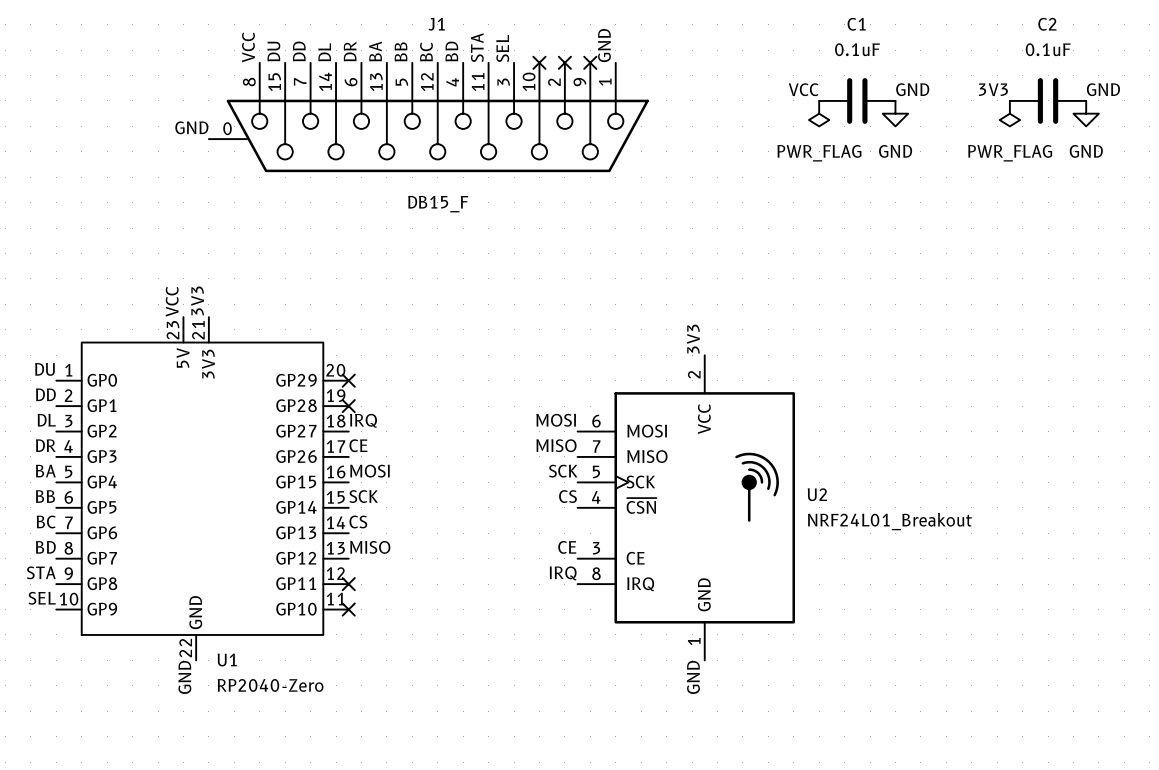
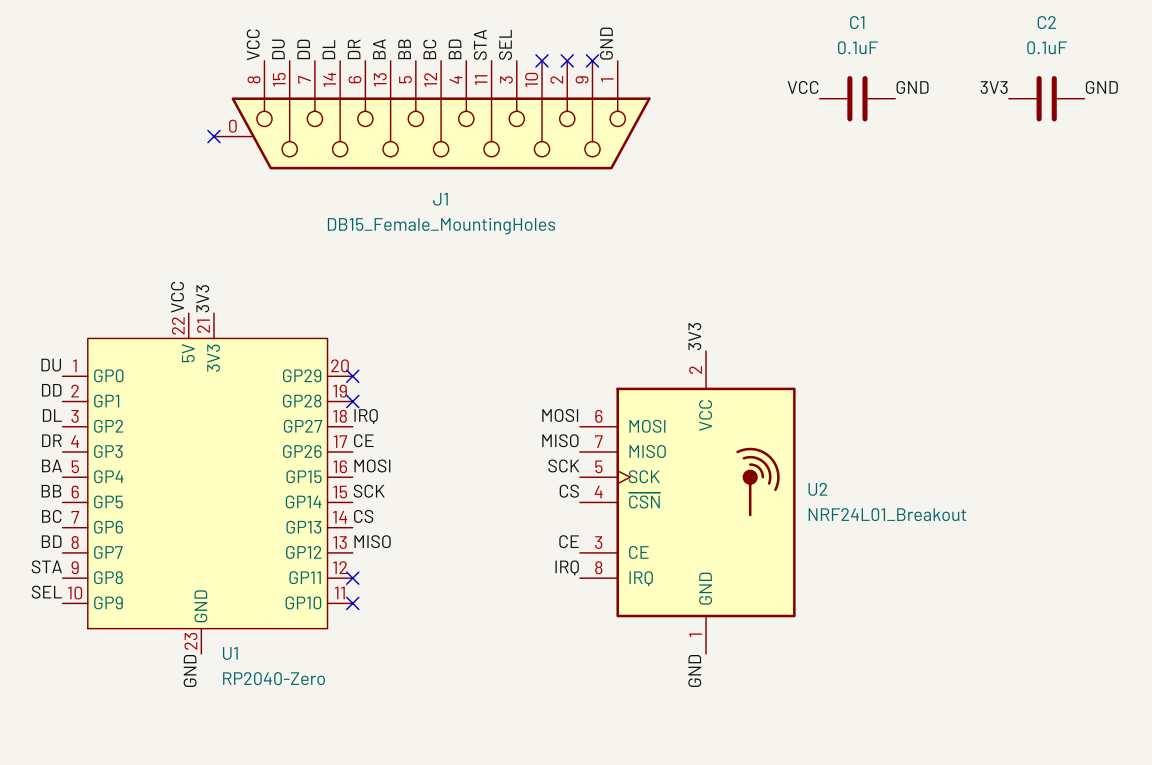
J1 name position: J1 (436, 24) -> J1 (440, 199)
power symbol: PWR_FLAG (819, 113) -> none
power symbol: GND (895, 113) -> none
power symbol: PWR_FLAG (1009, 113) -> none
power symbol: GND (1086, 113) -> none
label: GND (191, 127) -> none
no-connect mark: none -> (213, 136)
J1 value: DB15_F (438, 204) -> DB15_Female_MountingHoles (441, 226)
U1 pin number: 23 (172, 330) -> 22 (178, 325)
U1 pin number: 22 (185, 648) -> 23 (190, 641)

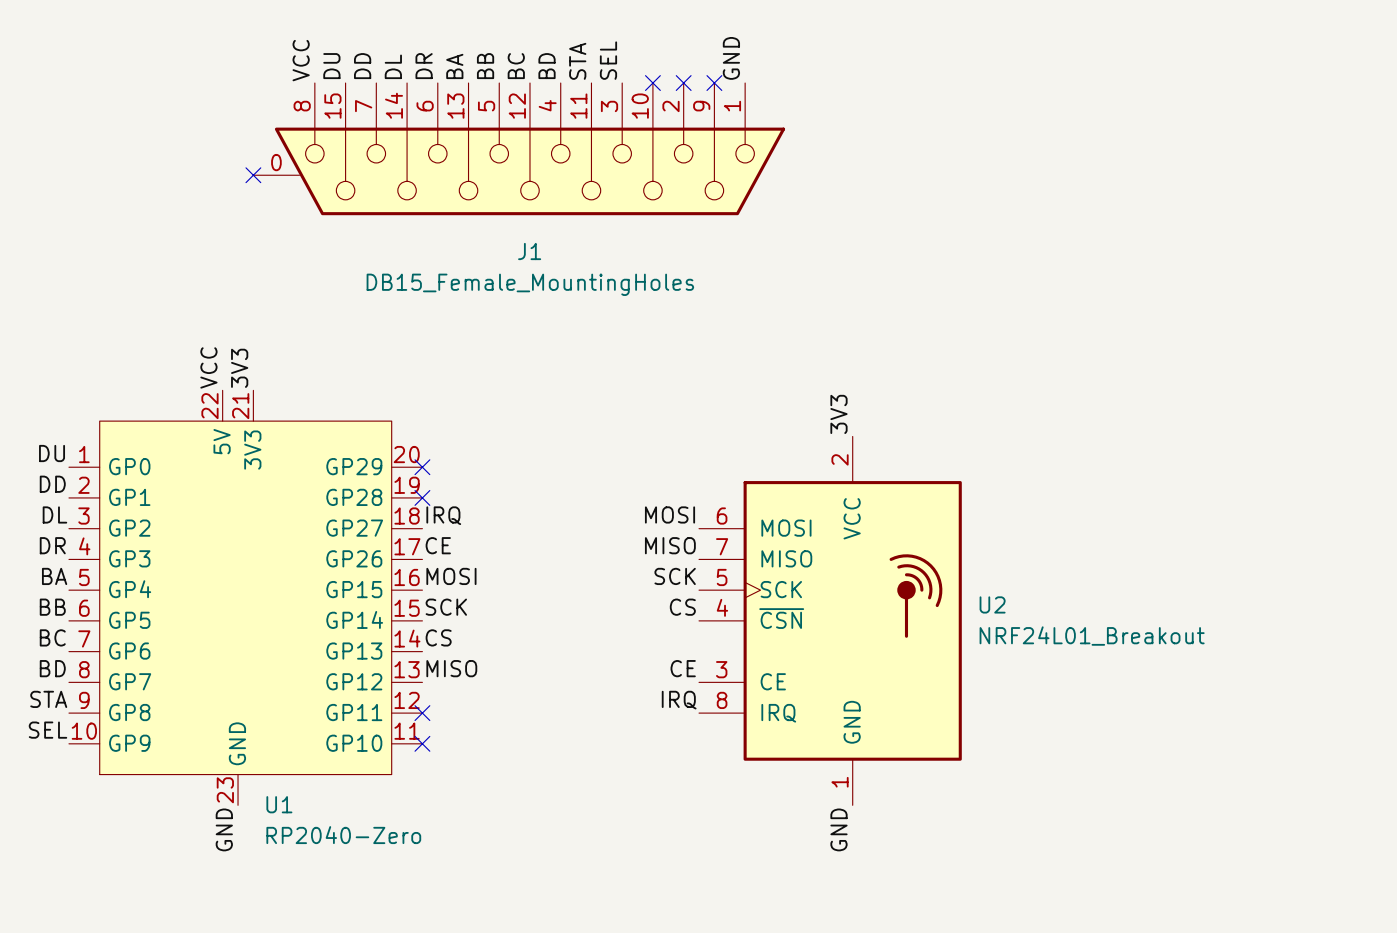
label: VCC (803, 87) -> none
label: GND (912, 87) -> none
label: 3V3 (994, 87) -> none
label: GND (1101, 87) -> none
C1: 0.1uF (857, 98) -> none
C2: 0.1uF (1046, 98) -> none

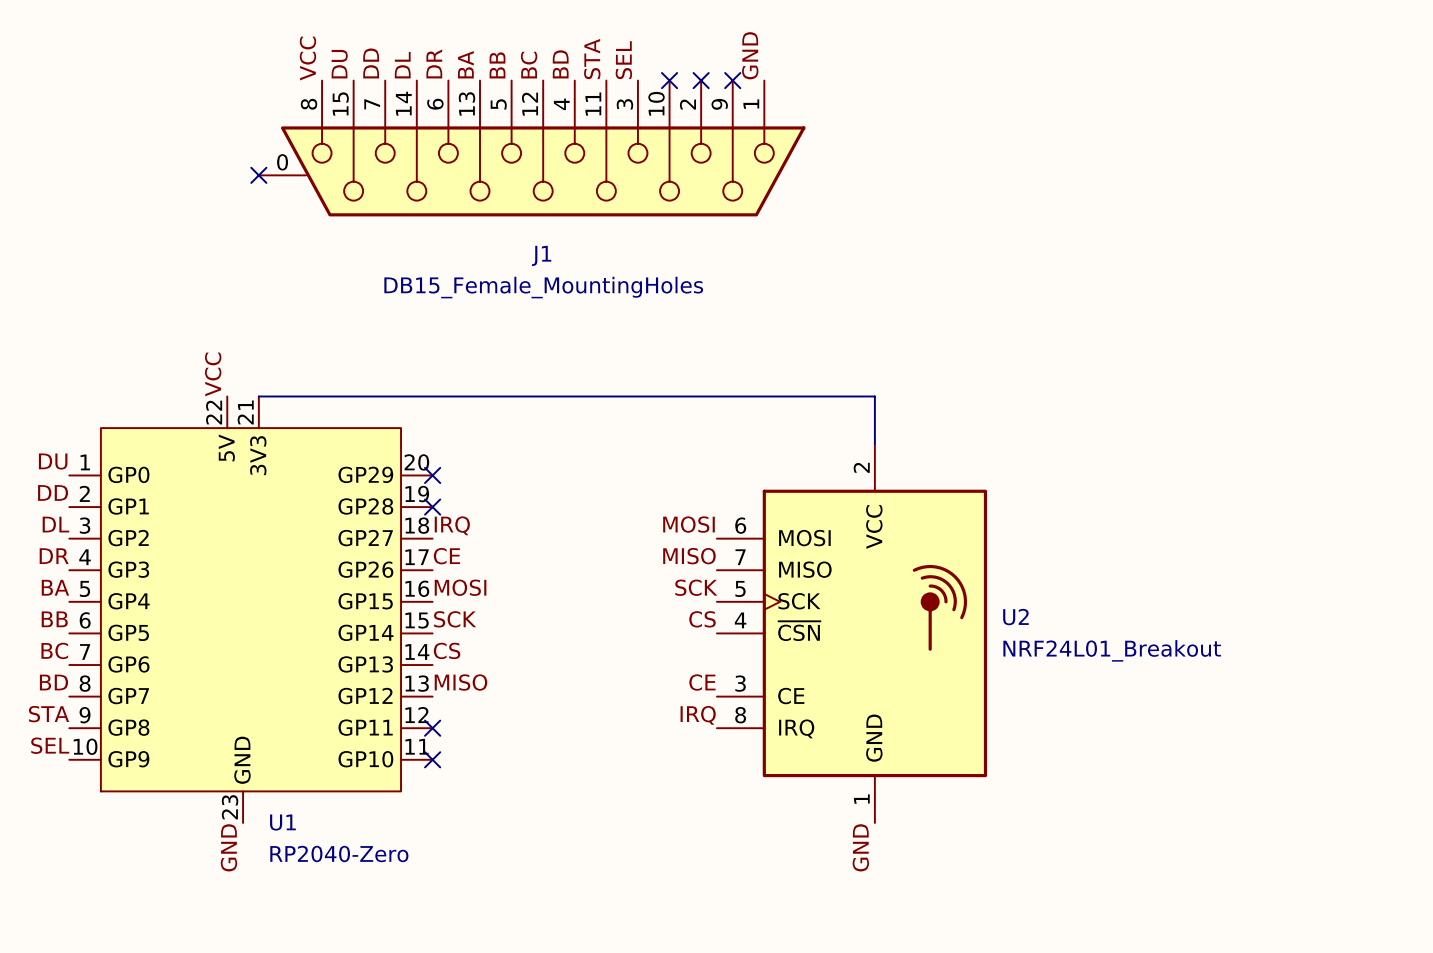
label: 3V3 (239, 368) -> none
wire: none -> (258, 396) (874, 396) (874, 443)
label: 3V3 (838, 414) -> none

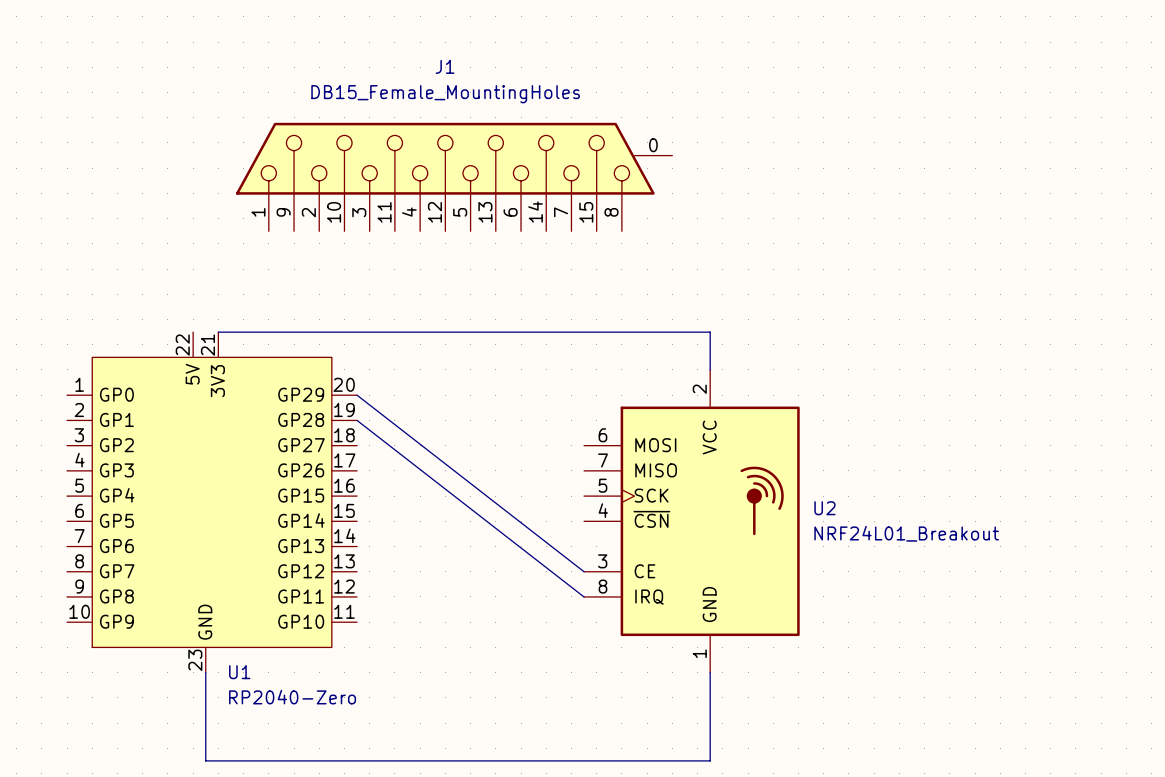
label: GND (750, 55) -> none
label: VCC (307, 58) -> none
label: STA (592, 59) -> none
label: SEL (623, 60) -> none
label: DD (371, 63) -> none
label: DR (434, 63) -> none
label: DU (339, 64) -> none
label: BA (465, 64) -> none
label: BD (560, 64) -> none
label: DL (402, 65) -> none
label: BB (497, 65) -> none
label: BC (529, 65) -> none
no-connect mark: (669, 80) -> none
no-connect mark: (701, 80) -> none
no-connect mark: (732, 80) -> none
J1 rotation: 0° (543, 171) -> 180° (445, 158)
no-connect mark: (258, 175) -> none
J1 name position: J1 (541, 255) -> J1 (445, 66)
J1 value position: DB15_Female_MountingHoles (543, 287) -> DB15_Female_MountingHoles (445, 94)
label: VCC (213, 374) -> none
label: DU (53, 461) -> none
wire: none -> (357, 395) (584, 571)
no-connect mark: (432, 475) -> none
label: DD (53, 492) -> none
wire: none -> (357, 420) (584, 596)
no-connect mark: (432, 507) -> none
label: DL (55, 524) -> none
label: MOSI (688, 524) -> none
label: IRQ (452, 525) -> none
label: DR (54, 556) -> none
label: CE (446, 556) -> none
label: MISO (689, 556) -> none
label: BA (55, 587) -> none
label: MOSI (460, 587) -> none
label: SCK (696, 587) -> none
label: BB (54, 619) -> none
label: SCK (455, 619) -> none
label: CS (702, 619) -> none
label: BC (54, 650) -> none
label: CS (447, 650) -> none
label: BD (53, 682) -> none
label: MISO (461, 682) -> none
label: CE (702, 682) -> none
label: STA (49, 714) -> none
label: IRQ (698, 715) -> none
no-connect mark: (432, 728) -> none
label: SEL (50, 745) -> none
no-connect mark: (432, 759) -> none
wire: none -> (205, 672) (205, 760) (710, 760) (710, 672)
label: GND (228, 847) -> none
label: GND (860, 847) -> none

